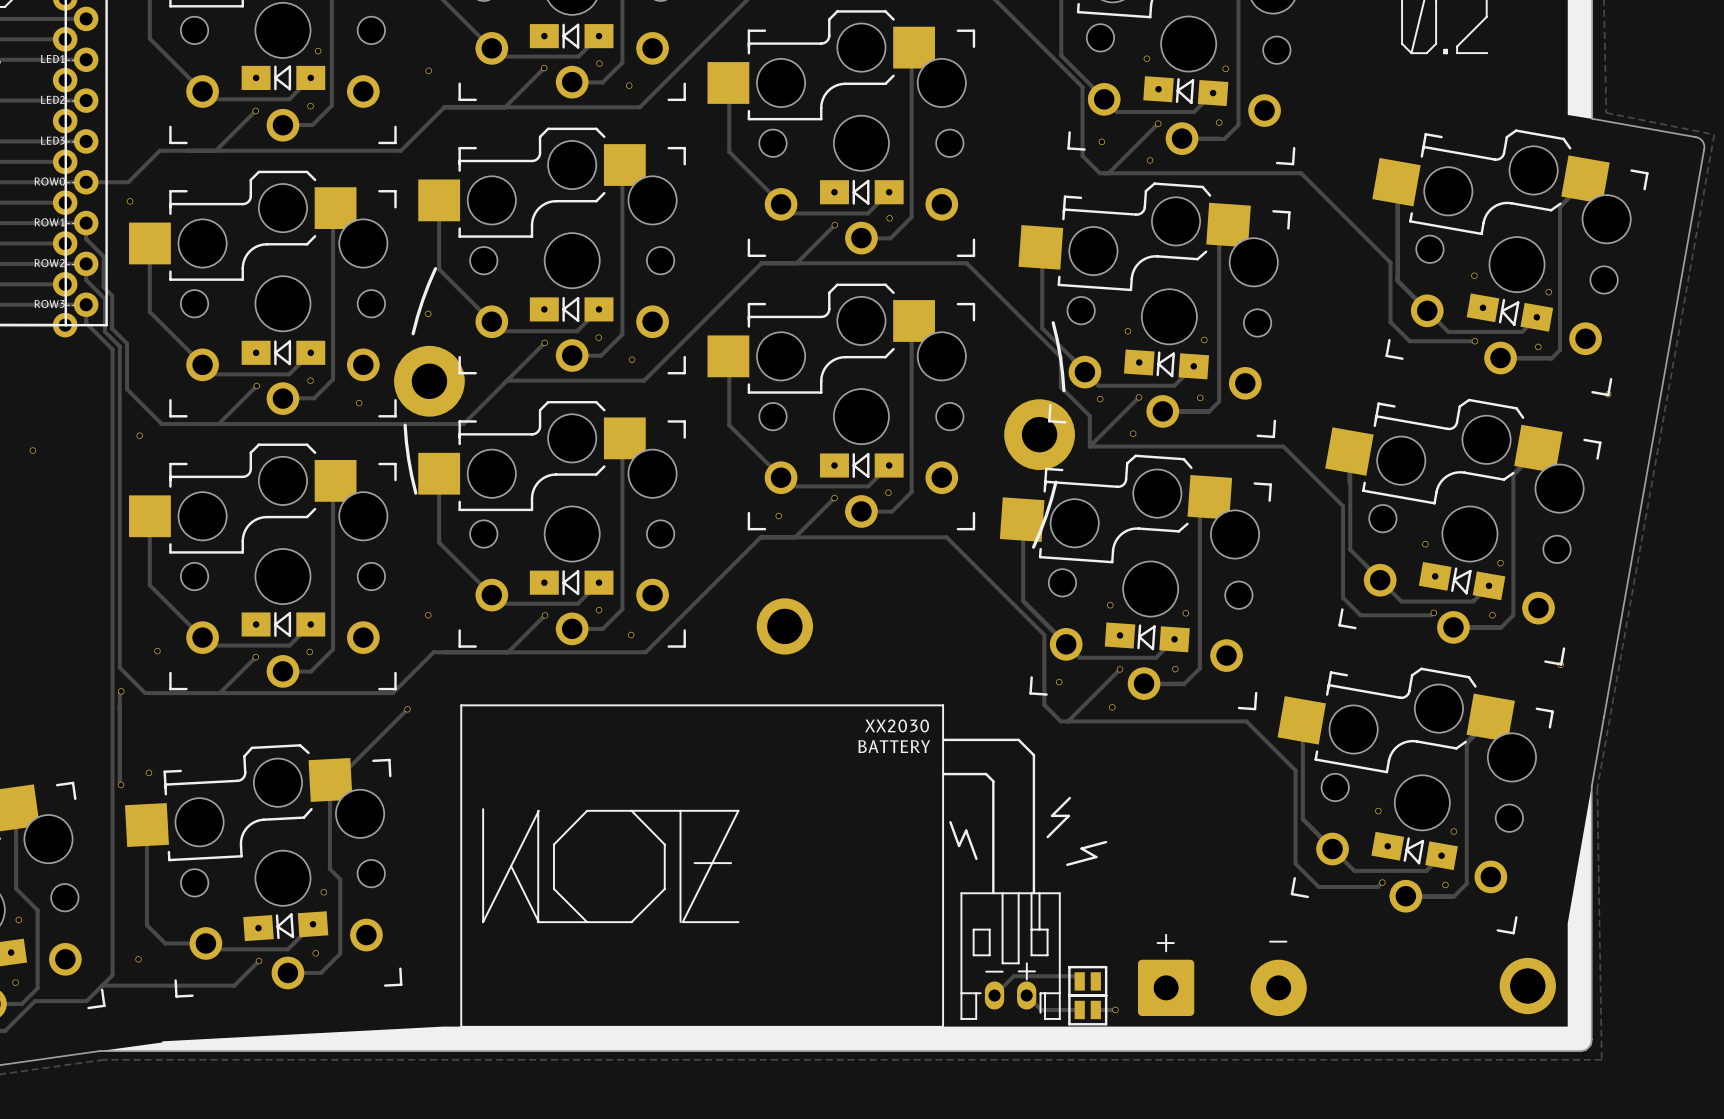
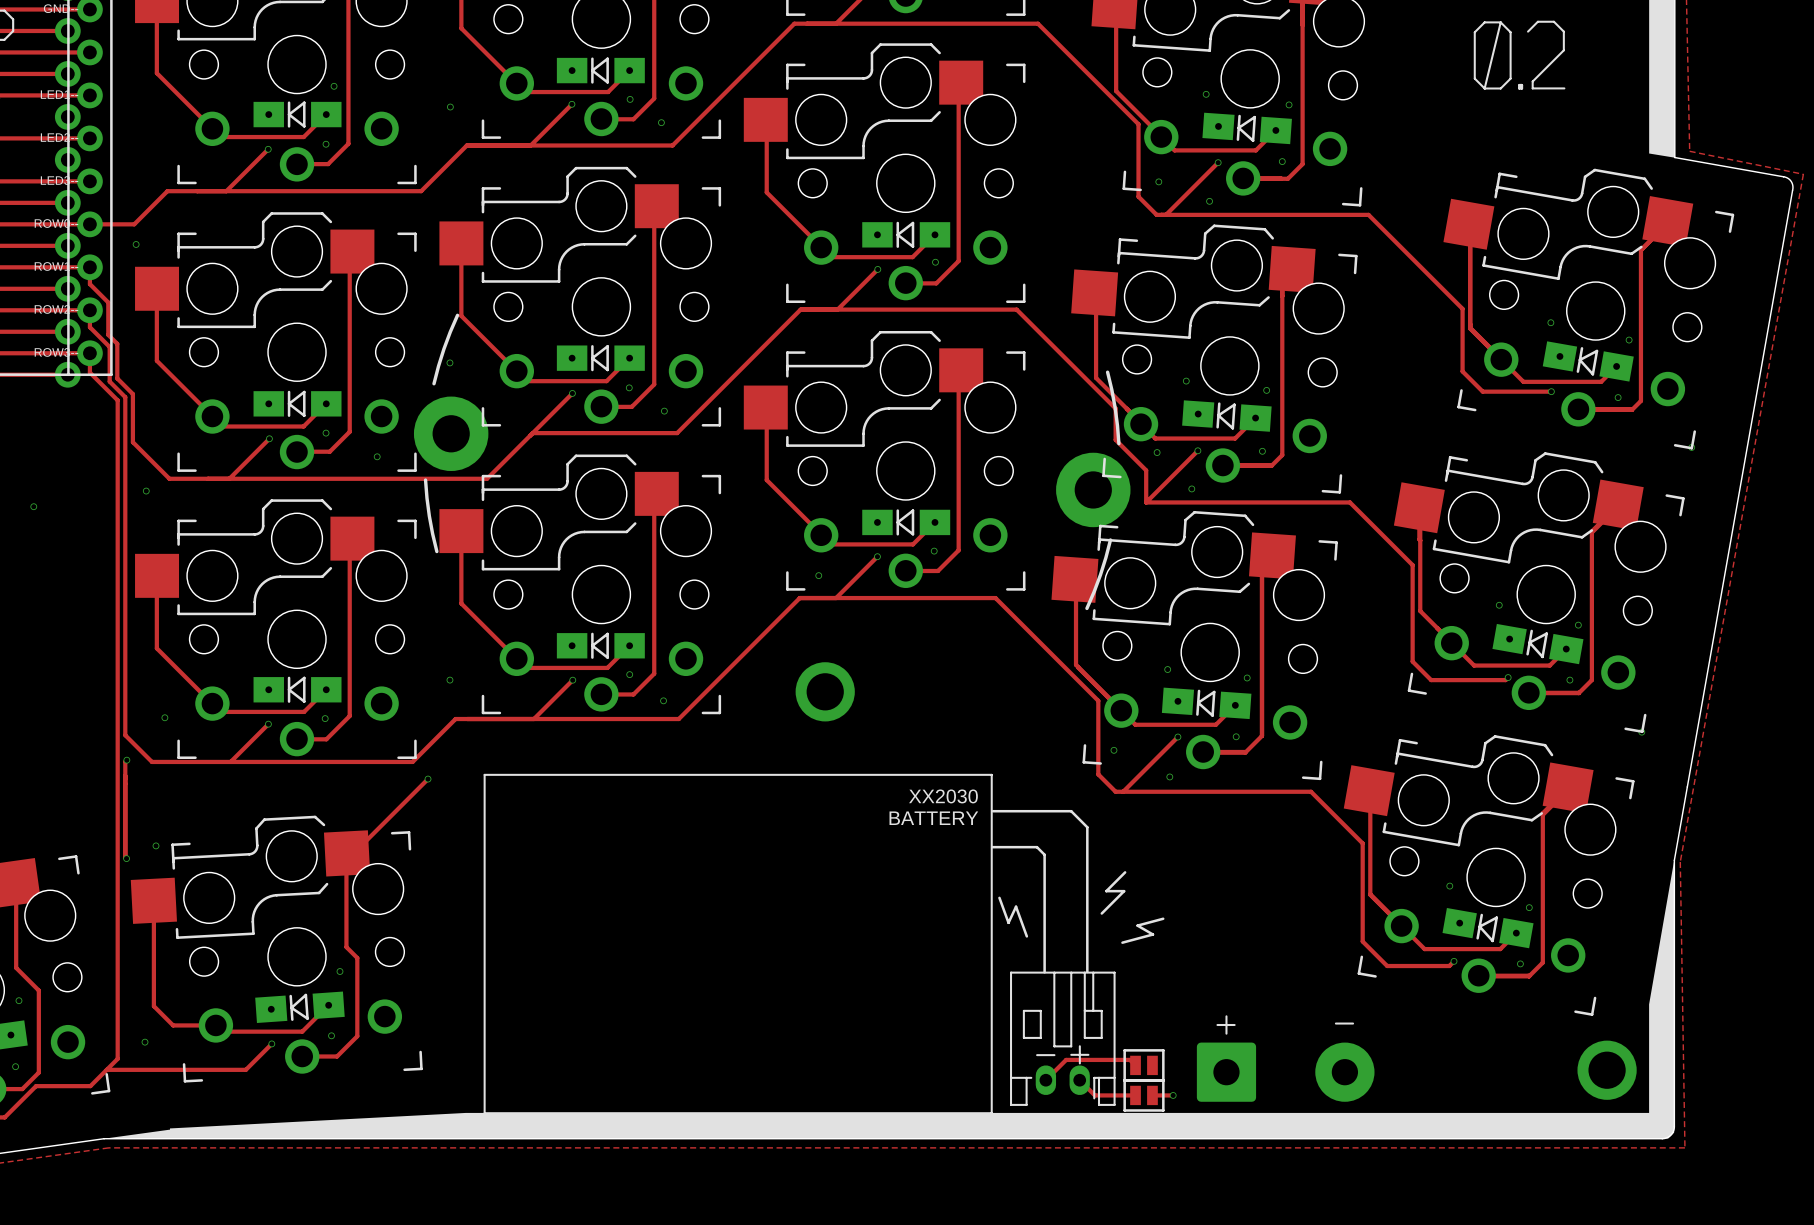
line: (483, 809) (483, 922) (538, 810) -> none
line: (538, 810) (538, 922) (631, 922) (664, 888) (664, 844) (631, 810) -> none
line: (680, 810) (680, 922) -> none
line: (694, 863) (731, 863) -> none
line: (511, 866) (538, 922) -> none
line: (587, 922) (553, 888) (553, 844) (587, 810) (738, 810) (682, 922) (738, 922) -> none

